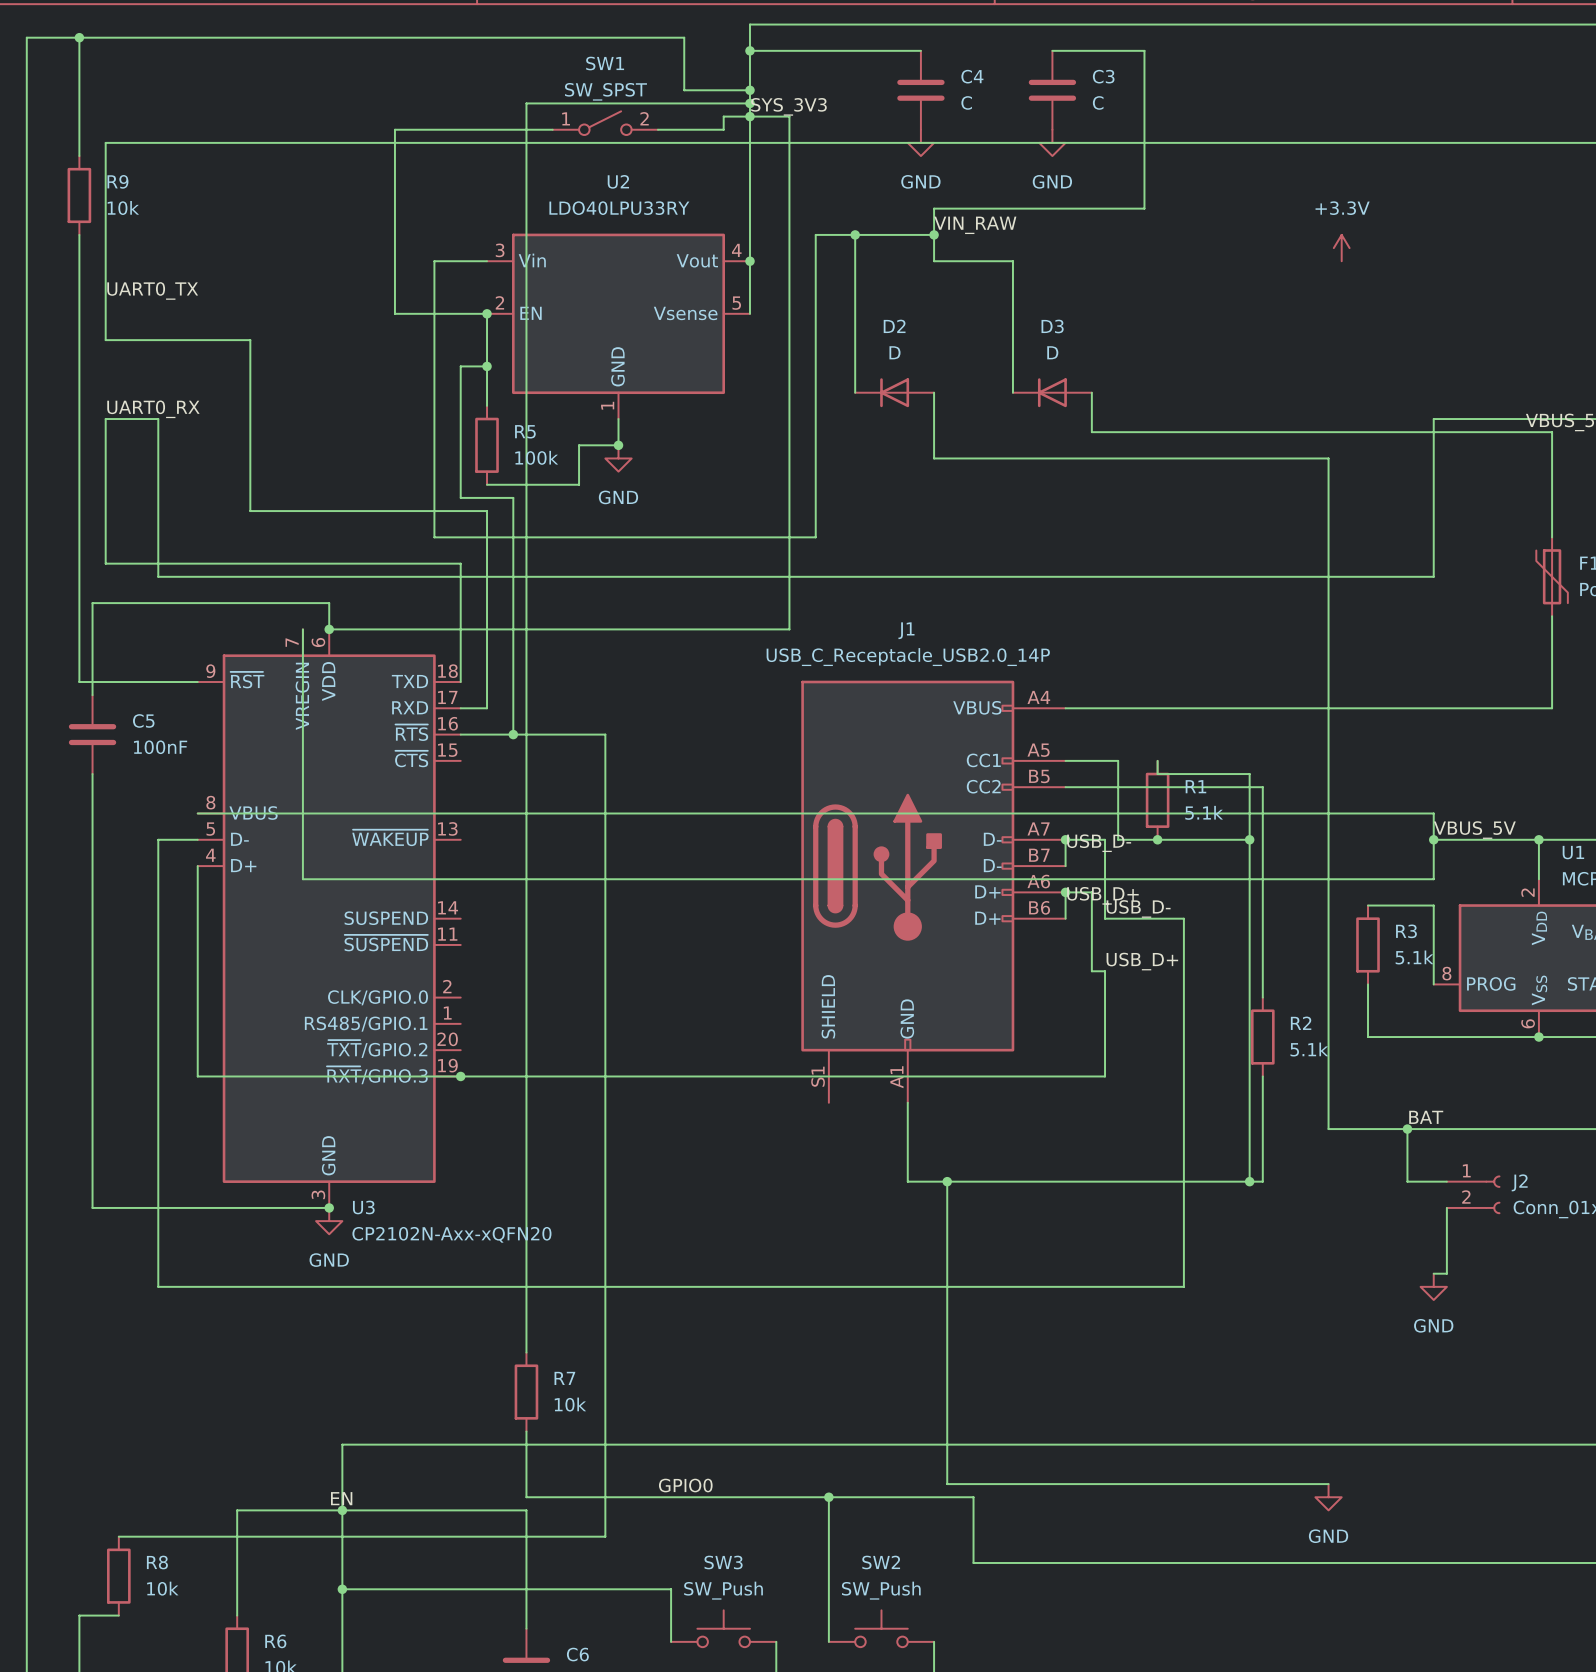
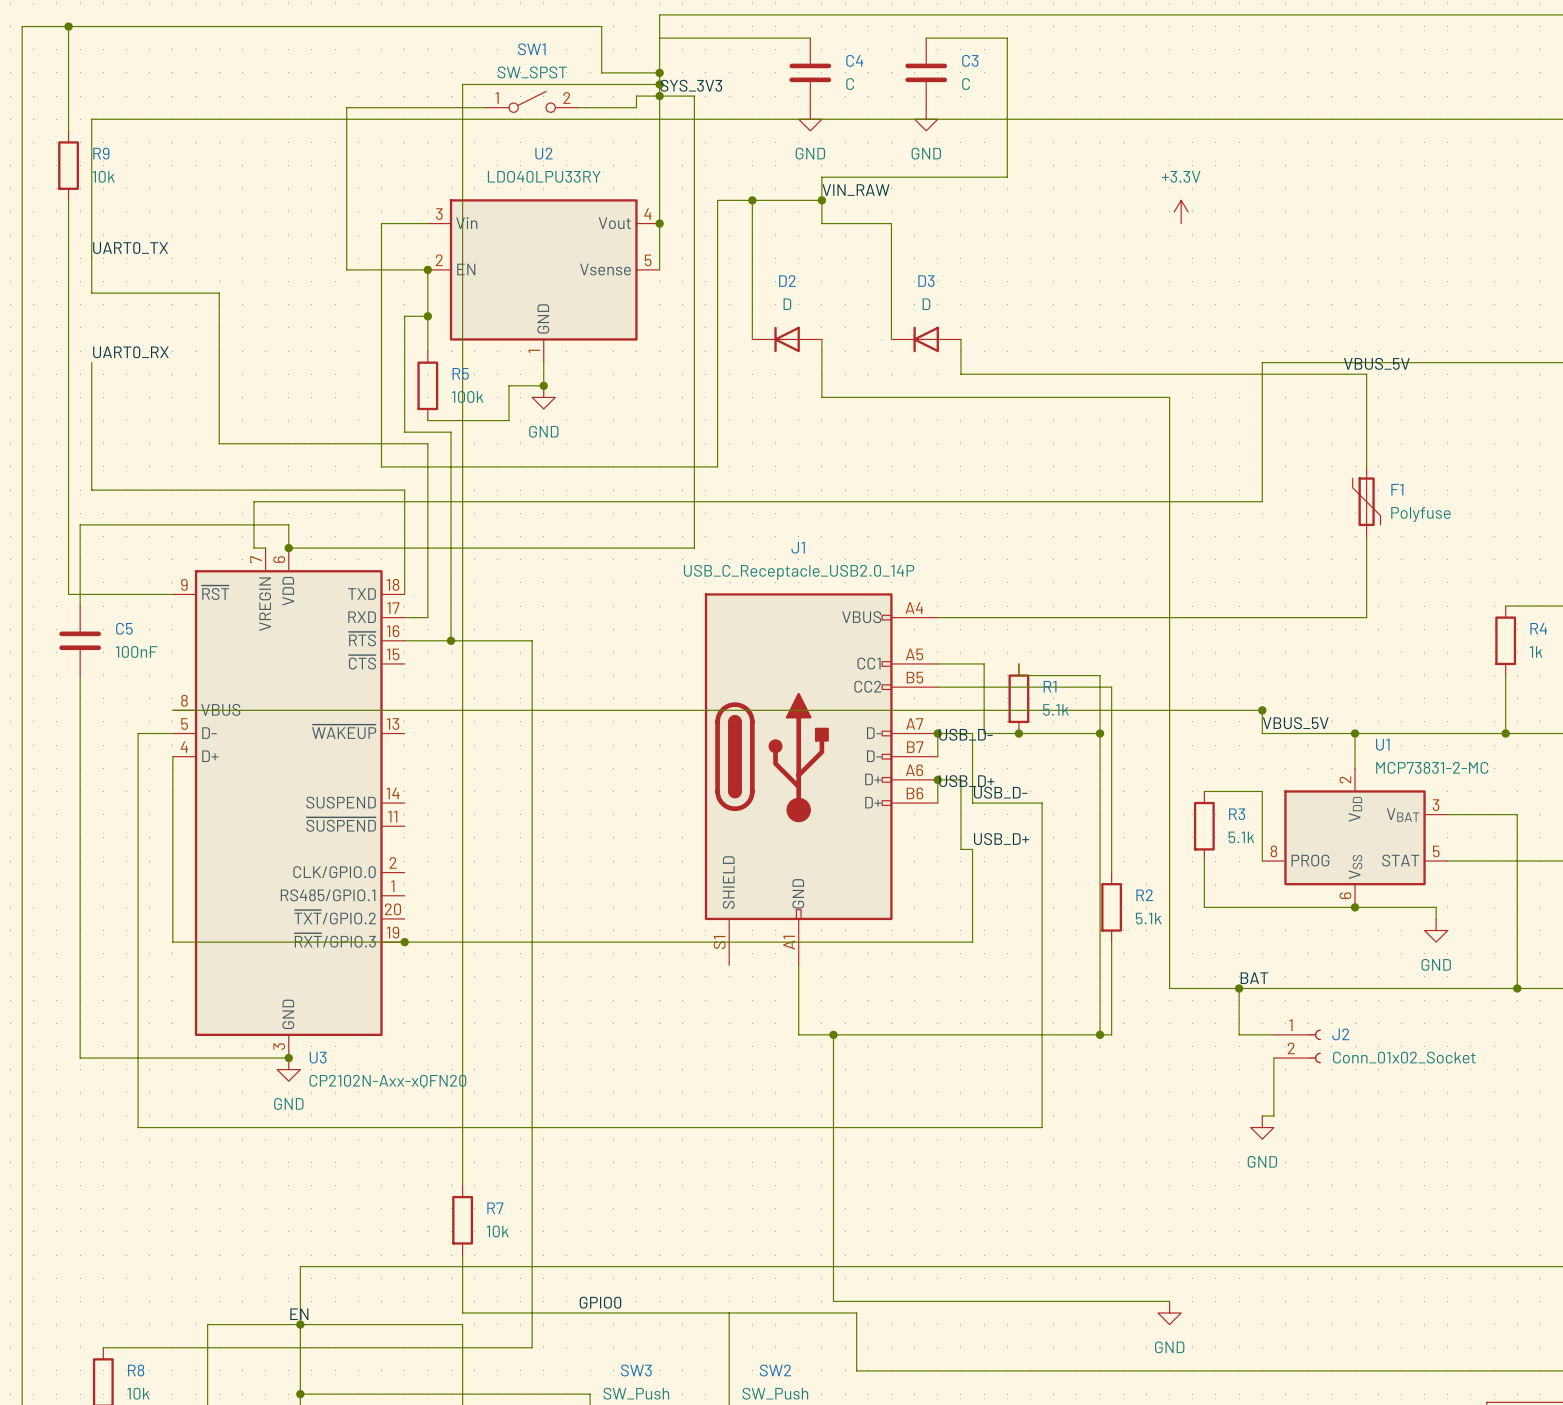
junction: (749, 50) -> none
wire: (105, 419) (158, 419) (158, 576) (289, 576) -> (265, 548) (253, 548) (253, 501)
wire: (302, 629) (302, 879) (1433, 879) (1433, 839) -> none
junction position: (1433, 839) -> (1262, 710)
junction: (828, 1497) -> none

